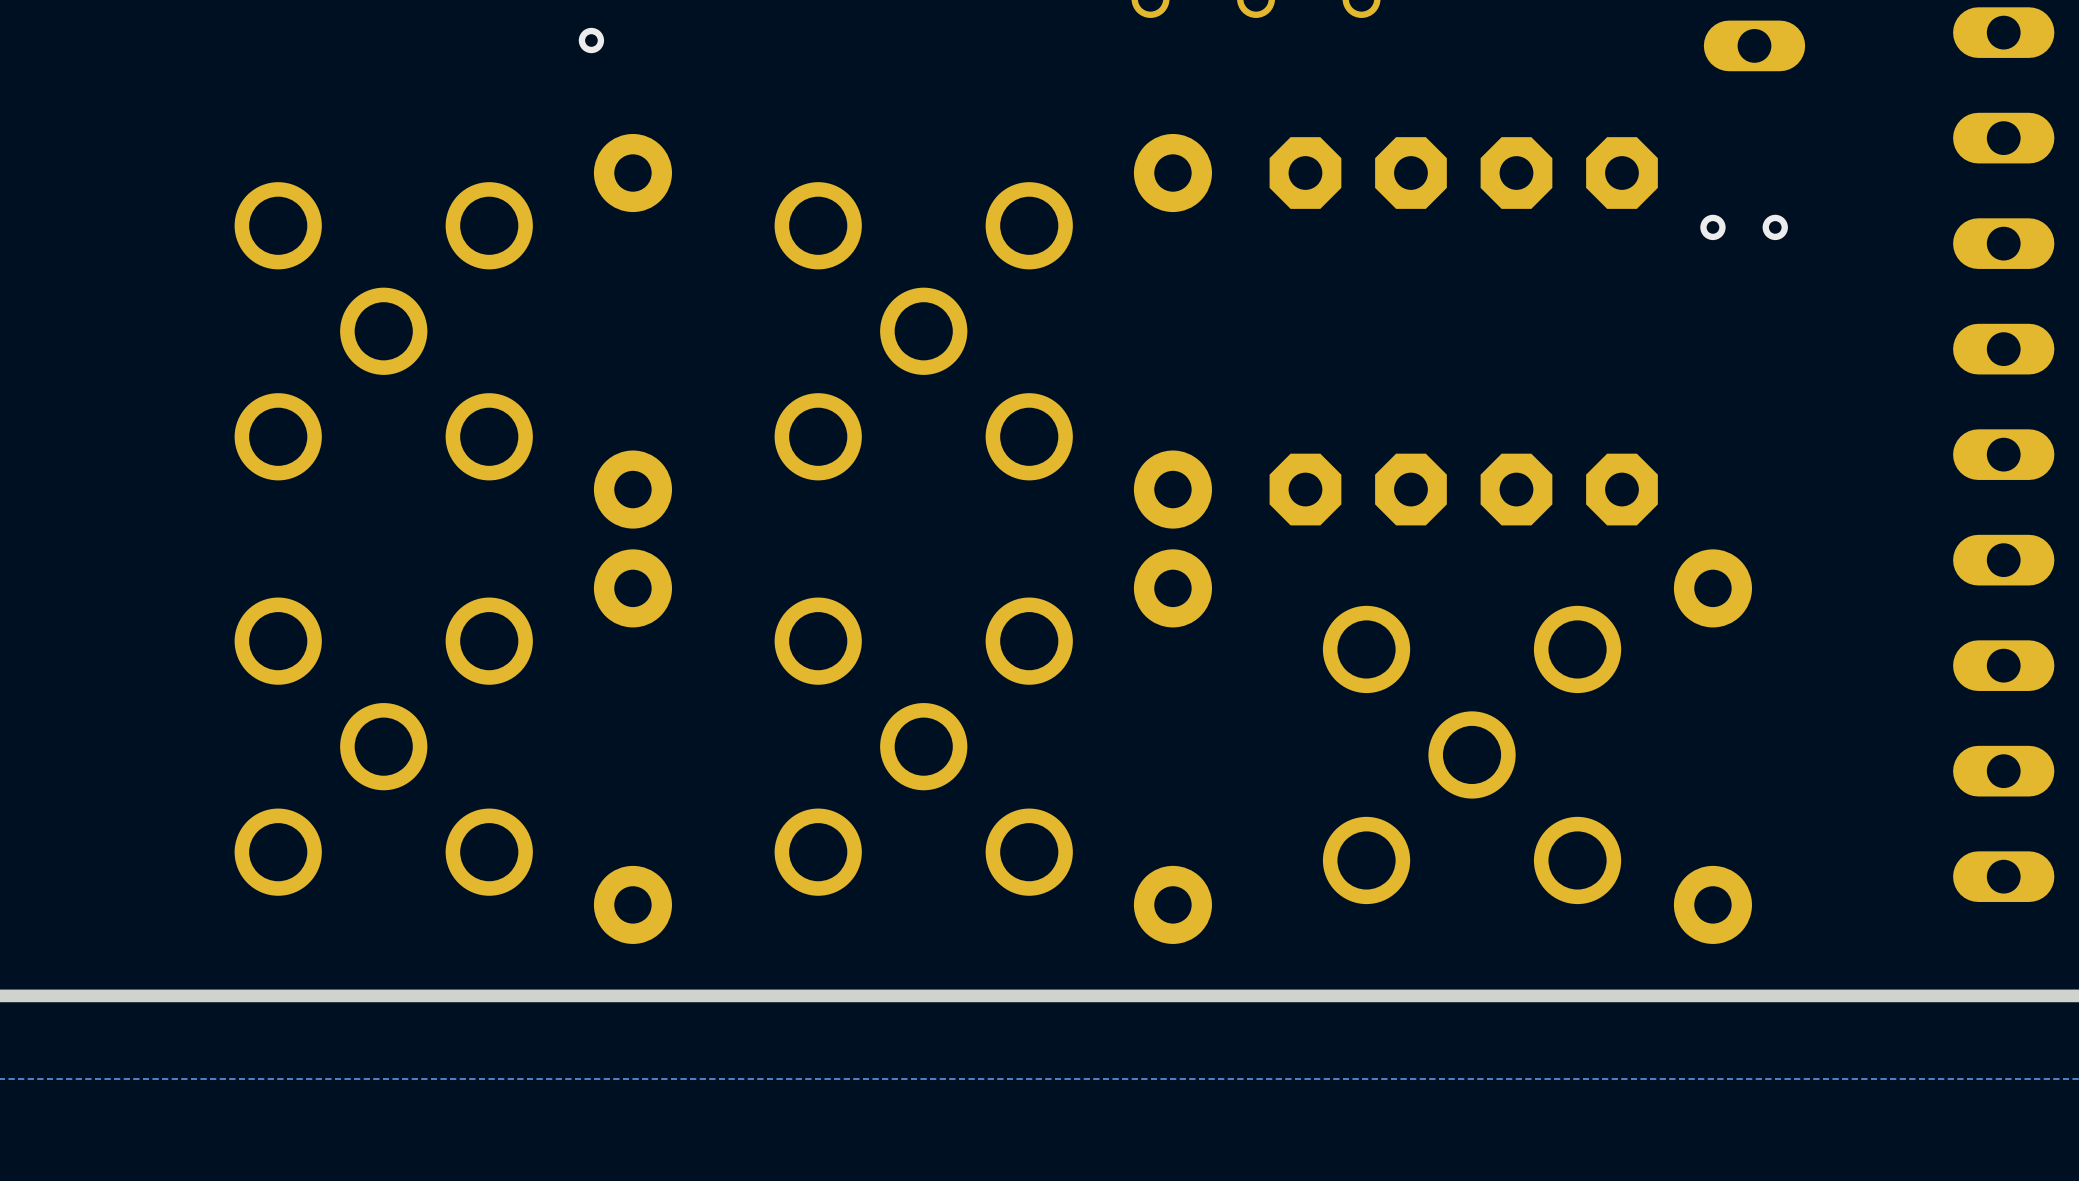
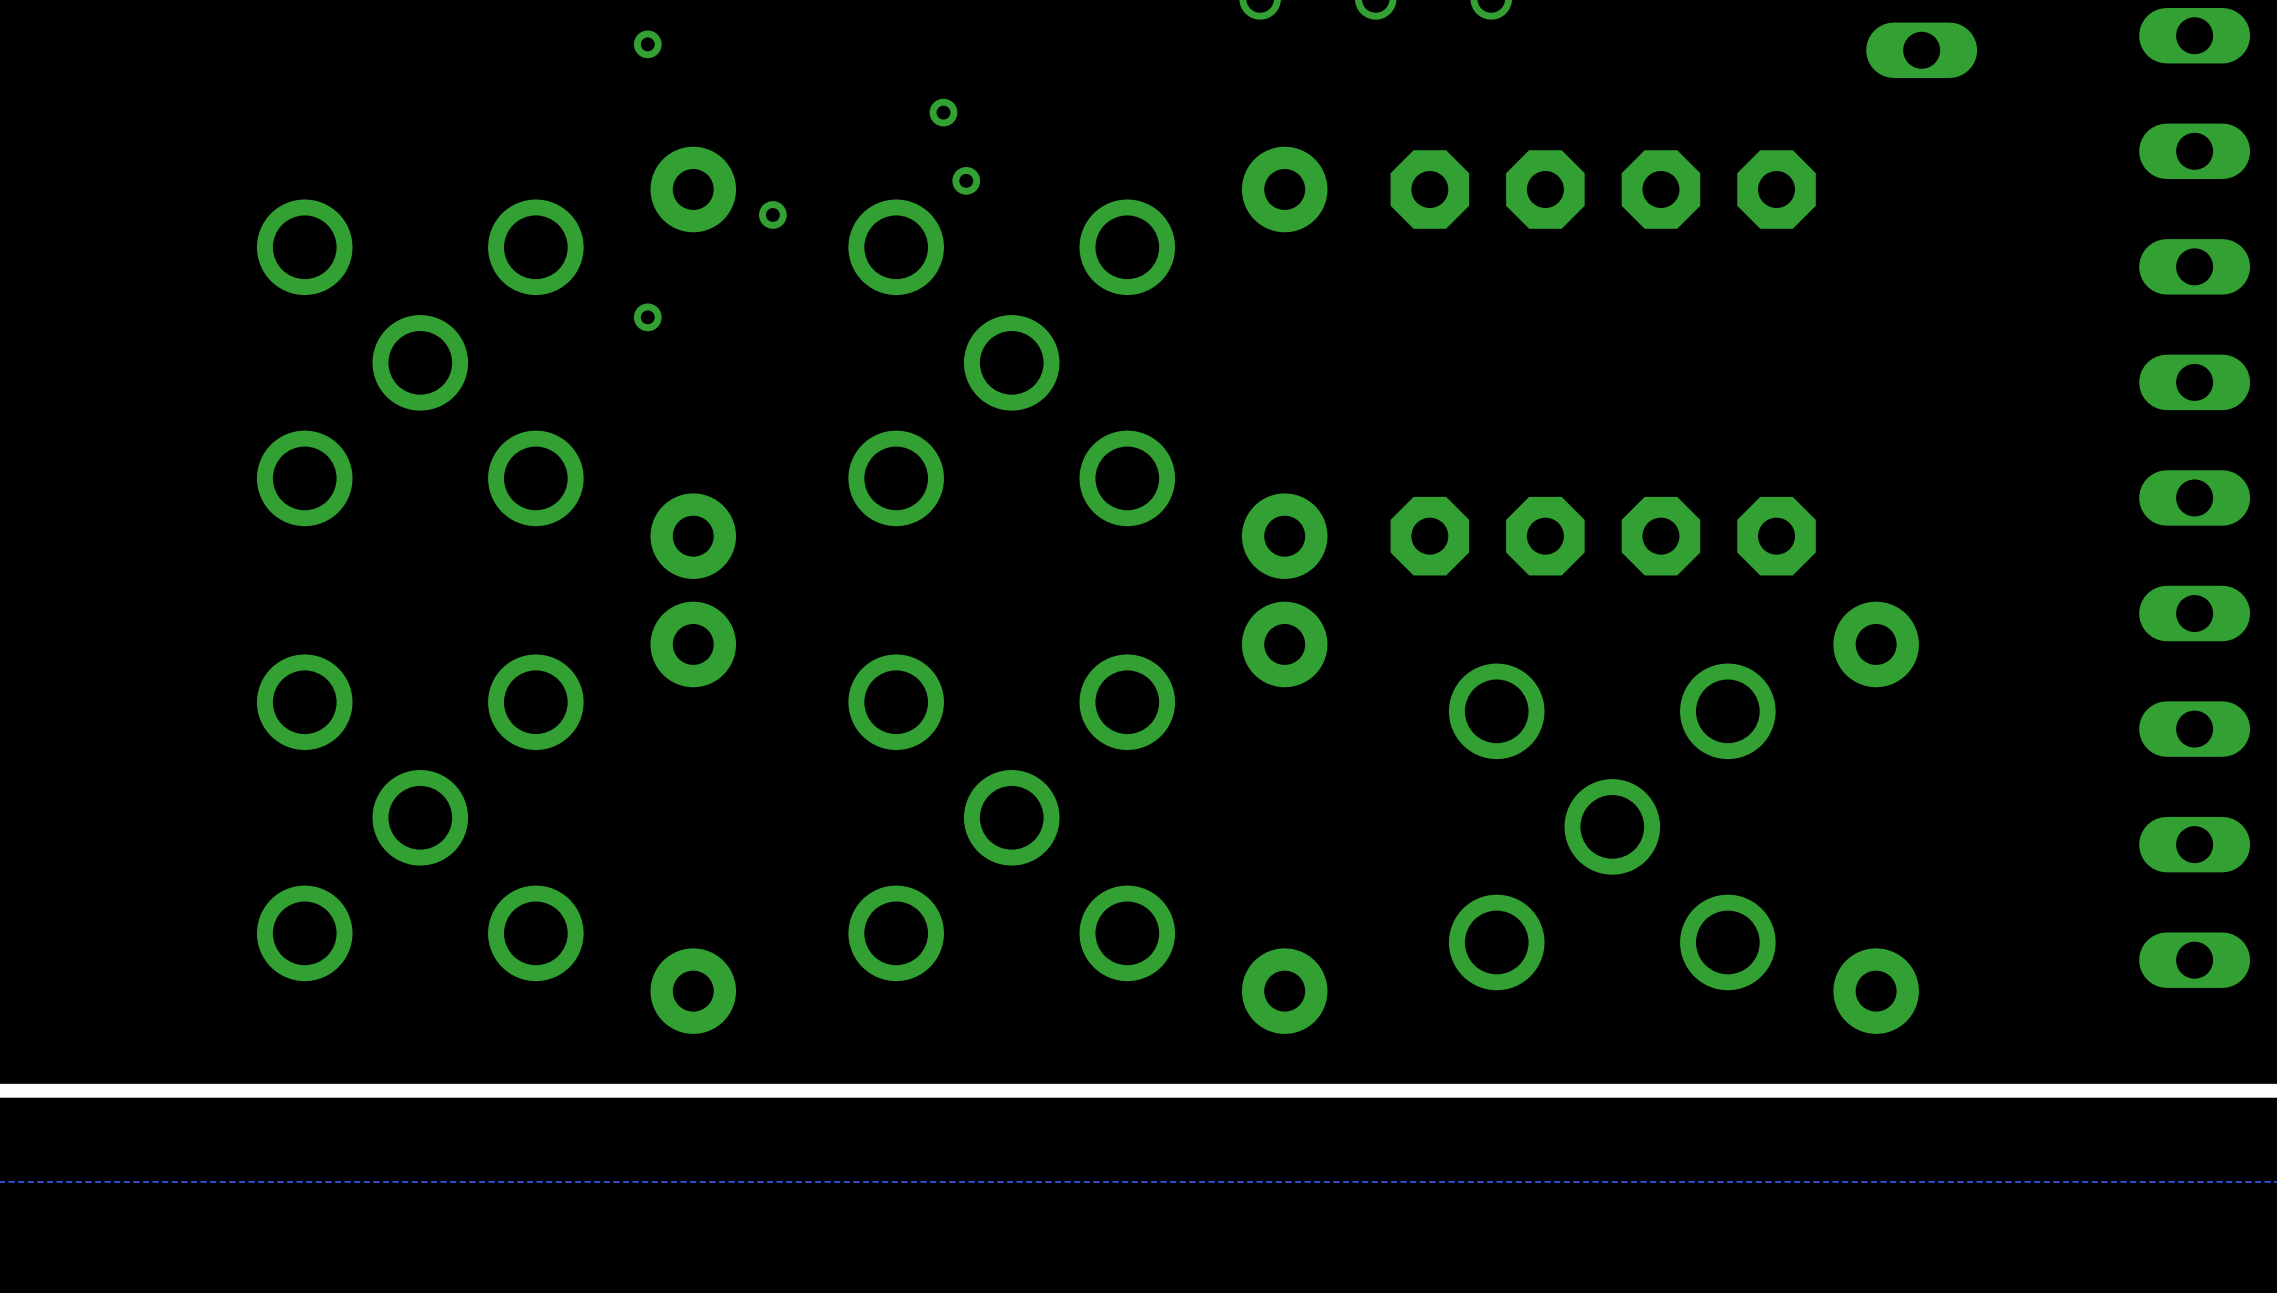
via: none -> (943, 112)
via: none -> (966, 180)
via: none -> (772, 214)
via: (1712, 227) -> none
via: (1775, 227) -> none
via: none -> (647, 317)

